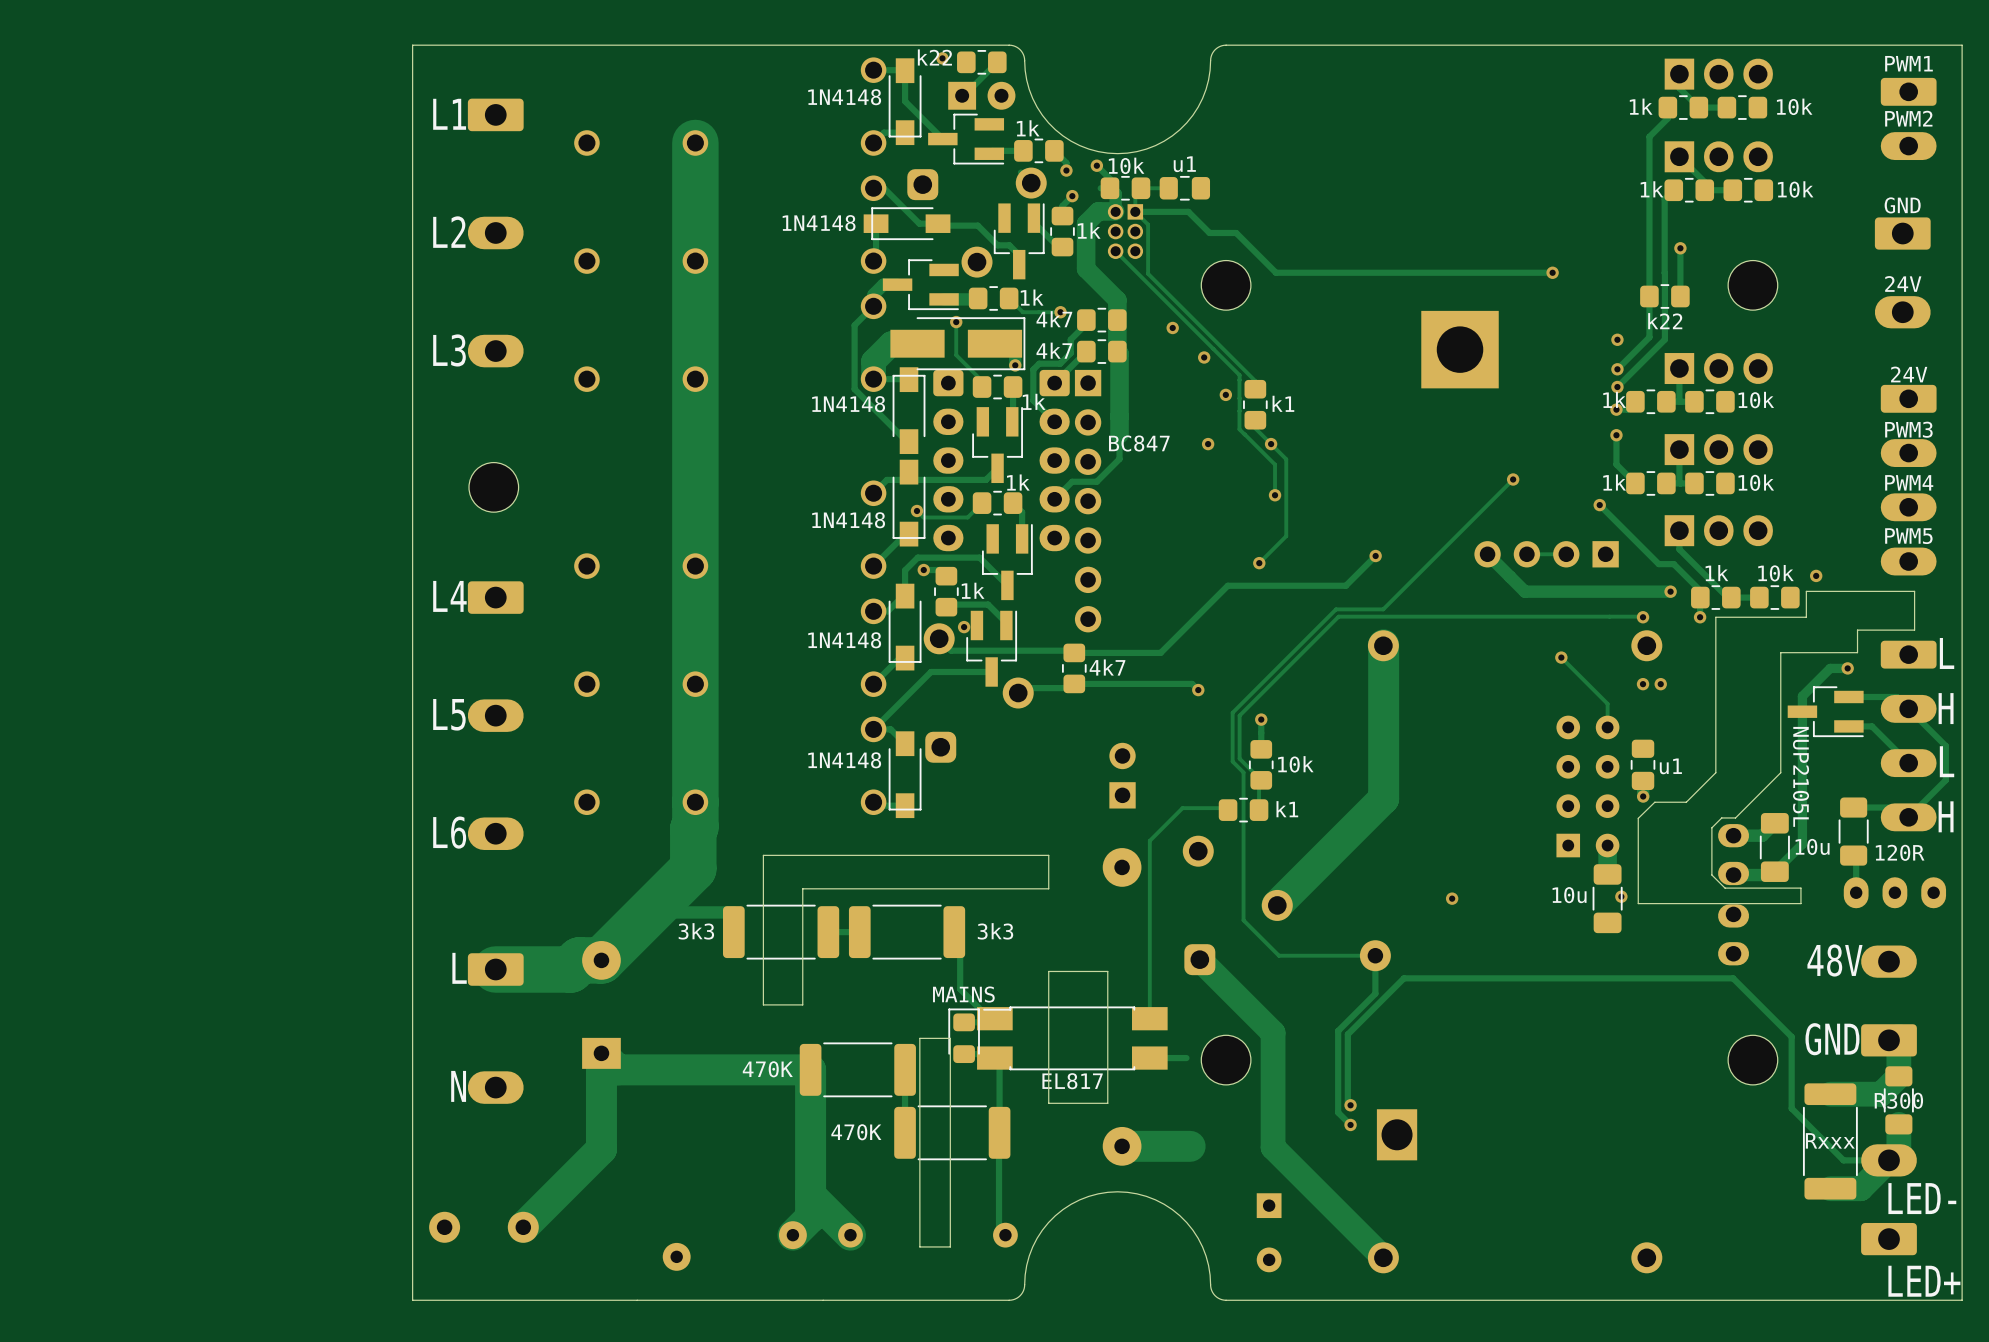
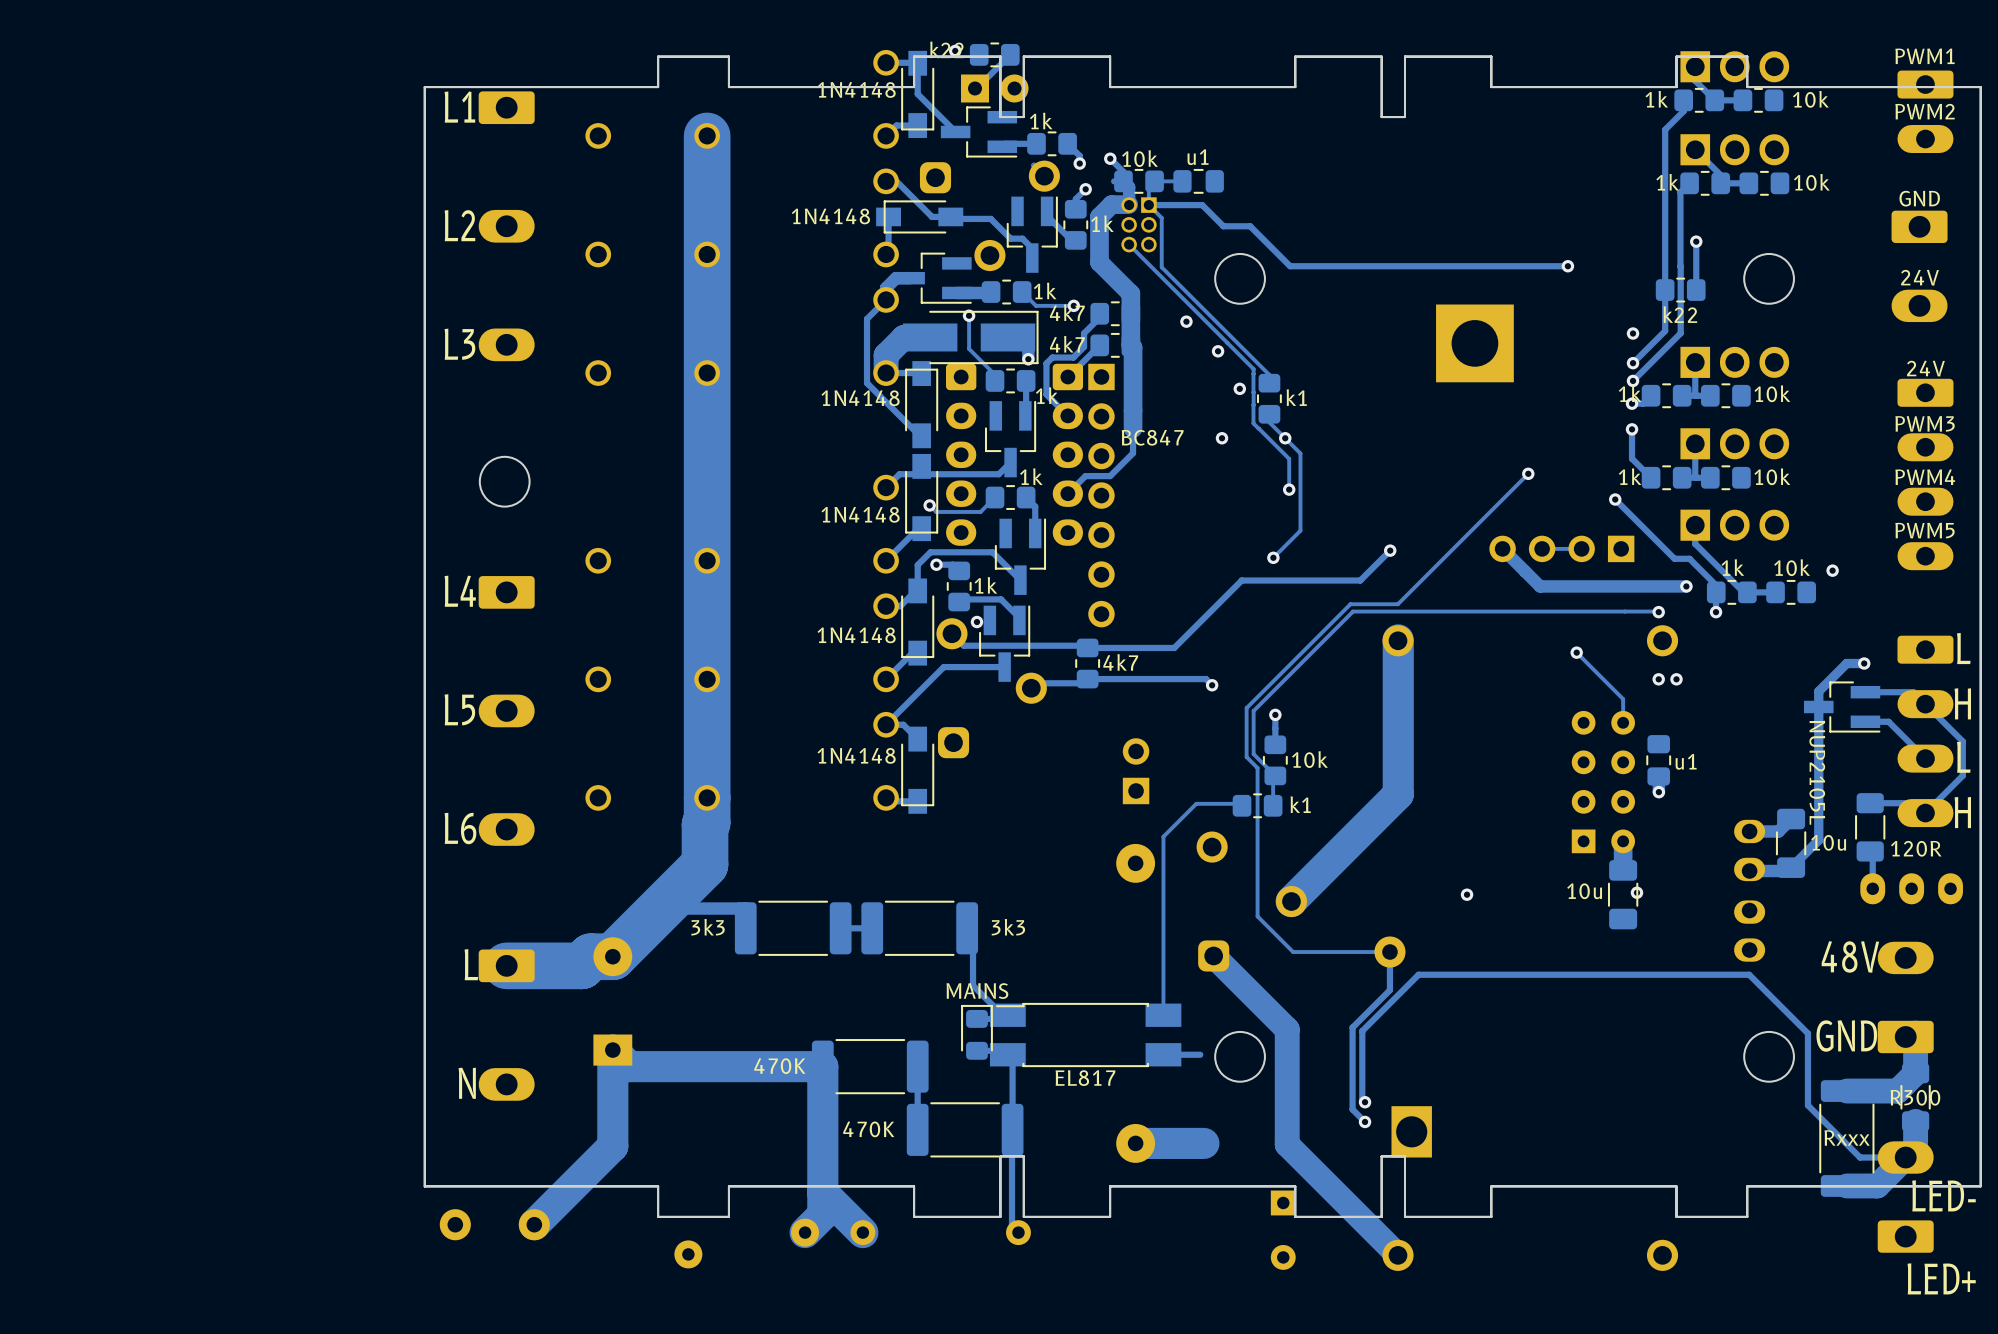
board edge: (1962, 45) (1224, 45) (1216, 48) (1211, 54) (1206, 89) (1198, 107) (1186, 122) (1172, 135) (1155, 145) (1136, 151) (1117, 153) (1098, 151) (1079, 145) (1062, 135) (1048, 122) (1037, 107) (1029, 89) (1023, 54) (1018, 48) (1011, 45) (412, 45) (412, 1300) (1011, 1300) (1018, 1297) (1023, 1290) (1029, 1256) (1037, 1238) (1048, 1222) (1062, 1209) (1079, 1199) (1098, 1193) (1117, 1191) (1136, 1193) (1155, 1199) (1172, 1209) (1186, 1222) (1198, 1238) (1206, 1256) (1211, 1290) (1216, 1297) (1224, 1300) (1962, 1300) (1962, 45) -> (1747, 56) (1747, 87) (1980, 87) (1980, 1186) (1747, 1186) (1747, 1216) (1676, 1216) (1676, 1186) (1491, 1186) (1491, 1216) (1404, 1216) (1404, 1156) (1381, 1156) (1381, 1216) (1295, 1216) (1295, 1186) (1110, 1186) (1110, 1216) (1023, 1216) (1023, 1156) (1000, 1156) (1000, 1216) (914, 1216) (914, 1186) (728, 1186) (728, 1216) (658, 1216) (658, 1186) (424, 1186) (424, 87) (658, 87) (658, 56) (728, 56) (728, 87) (914, 87) (914, 56) (1000, 56) (1000, 117) (1023, 117) (1023, 56) (1110, 56) (1110, 87) (1295, 87) (1295, 56) (1381, 56) (1381, 117) (1404, 117) (1404, 56) (1491, 56) (1491, 87) (1676, 87) (1676, 56) (1747, 56)
board edge: (1914, 591) (1806, 591) (1806, 617) (1715, 617) (1715, 772) (1686, 802) (1654, 802) (1638, 818) (1638, 903) (1800, 903) (1800, 888) (1725, 888) (1711, 875) (1711, 827) (1721, 817) (1735, 817) (1780, 772) (1780, 652) (1857, 652) (1857, 630) (1914, 630) (1914, 591) -> none
board edge: (1048, 855) (763, 855) (763, 1004) (802, 1004) (802, 888) (1048, 888) (1048, 855) -> none
board edge: (1107, 971) (1048, 971) (1048, 1103) (1107, 1103) (1107, 971) -> none
board edge: (919, 1246) (919, 1038) (950, 1038) (950, 1246) (919, 1246) -> none

